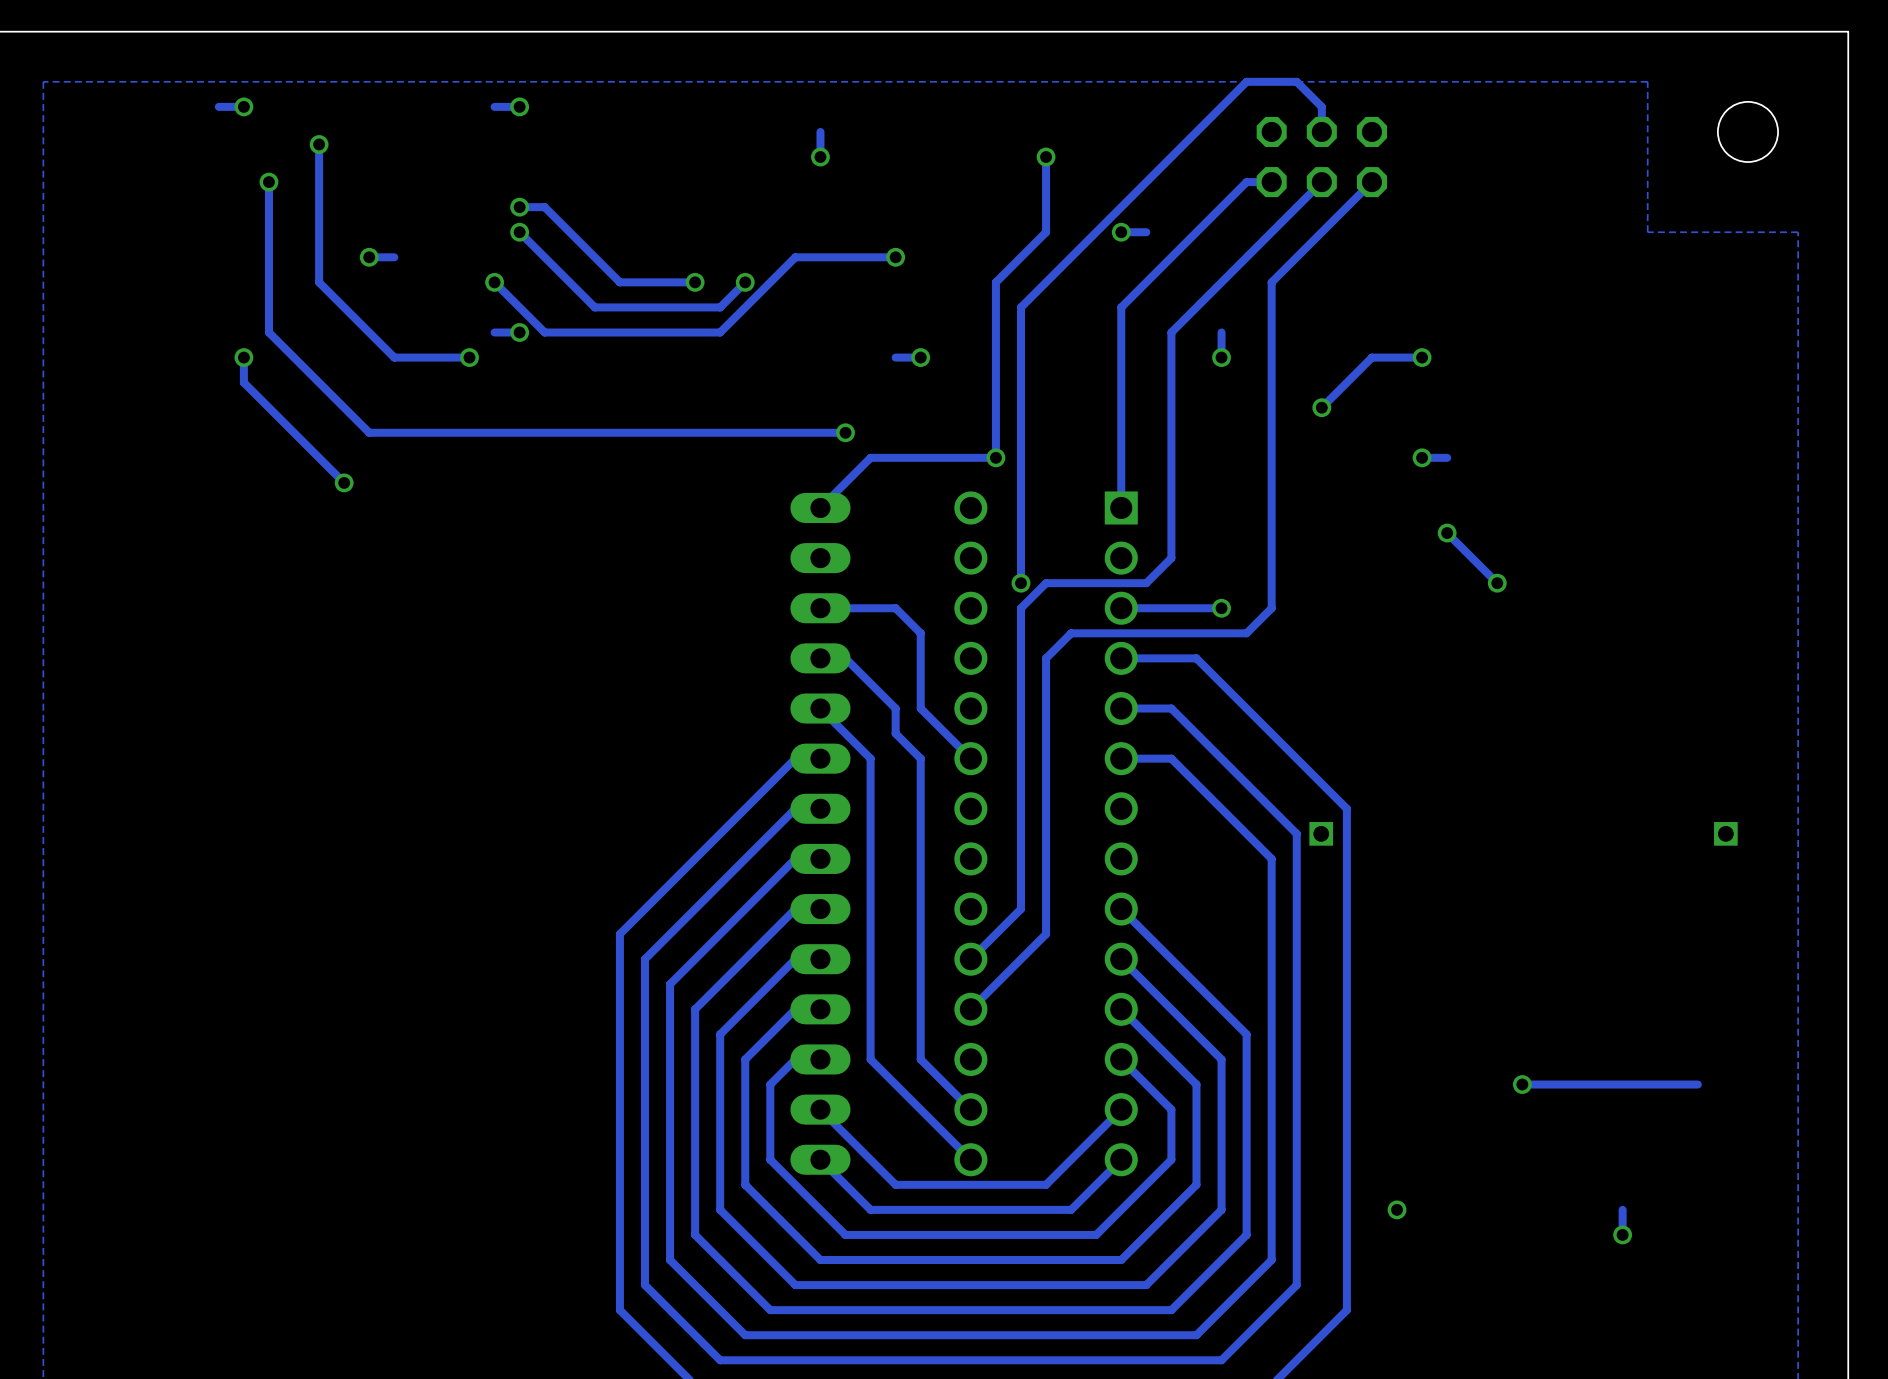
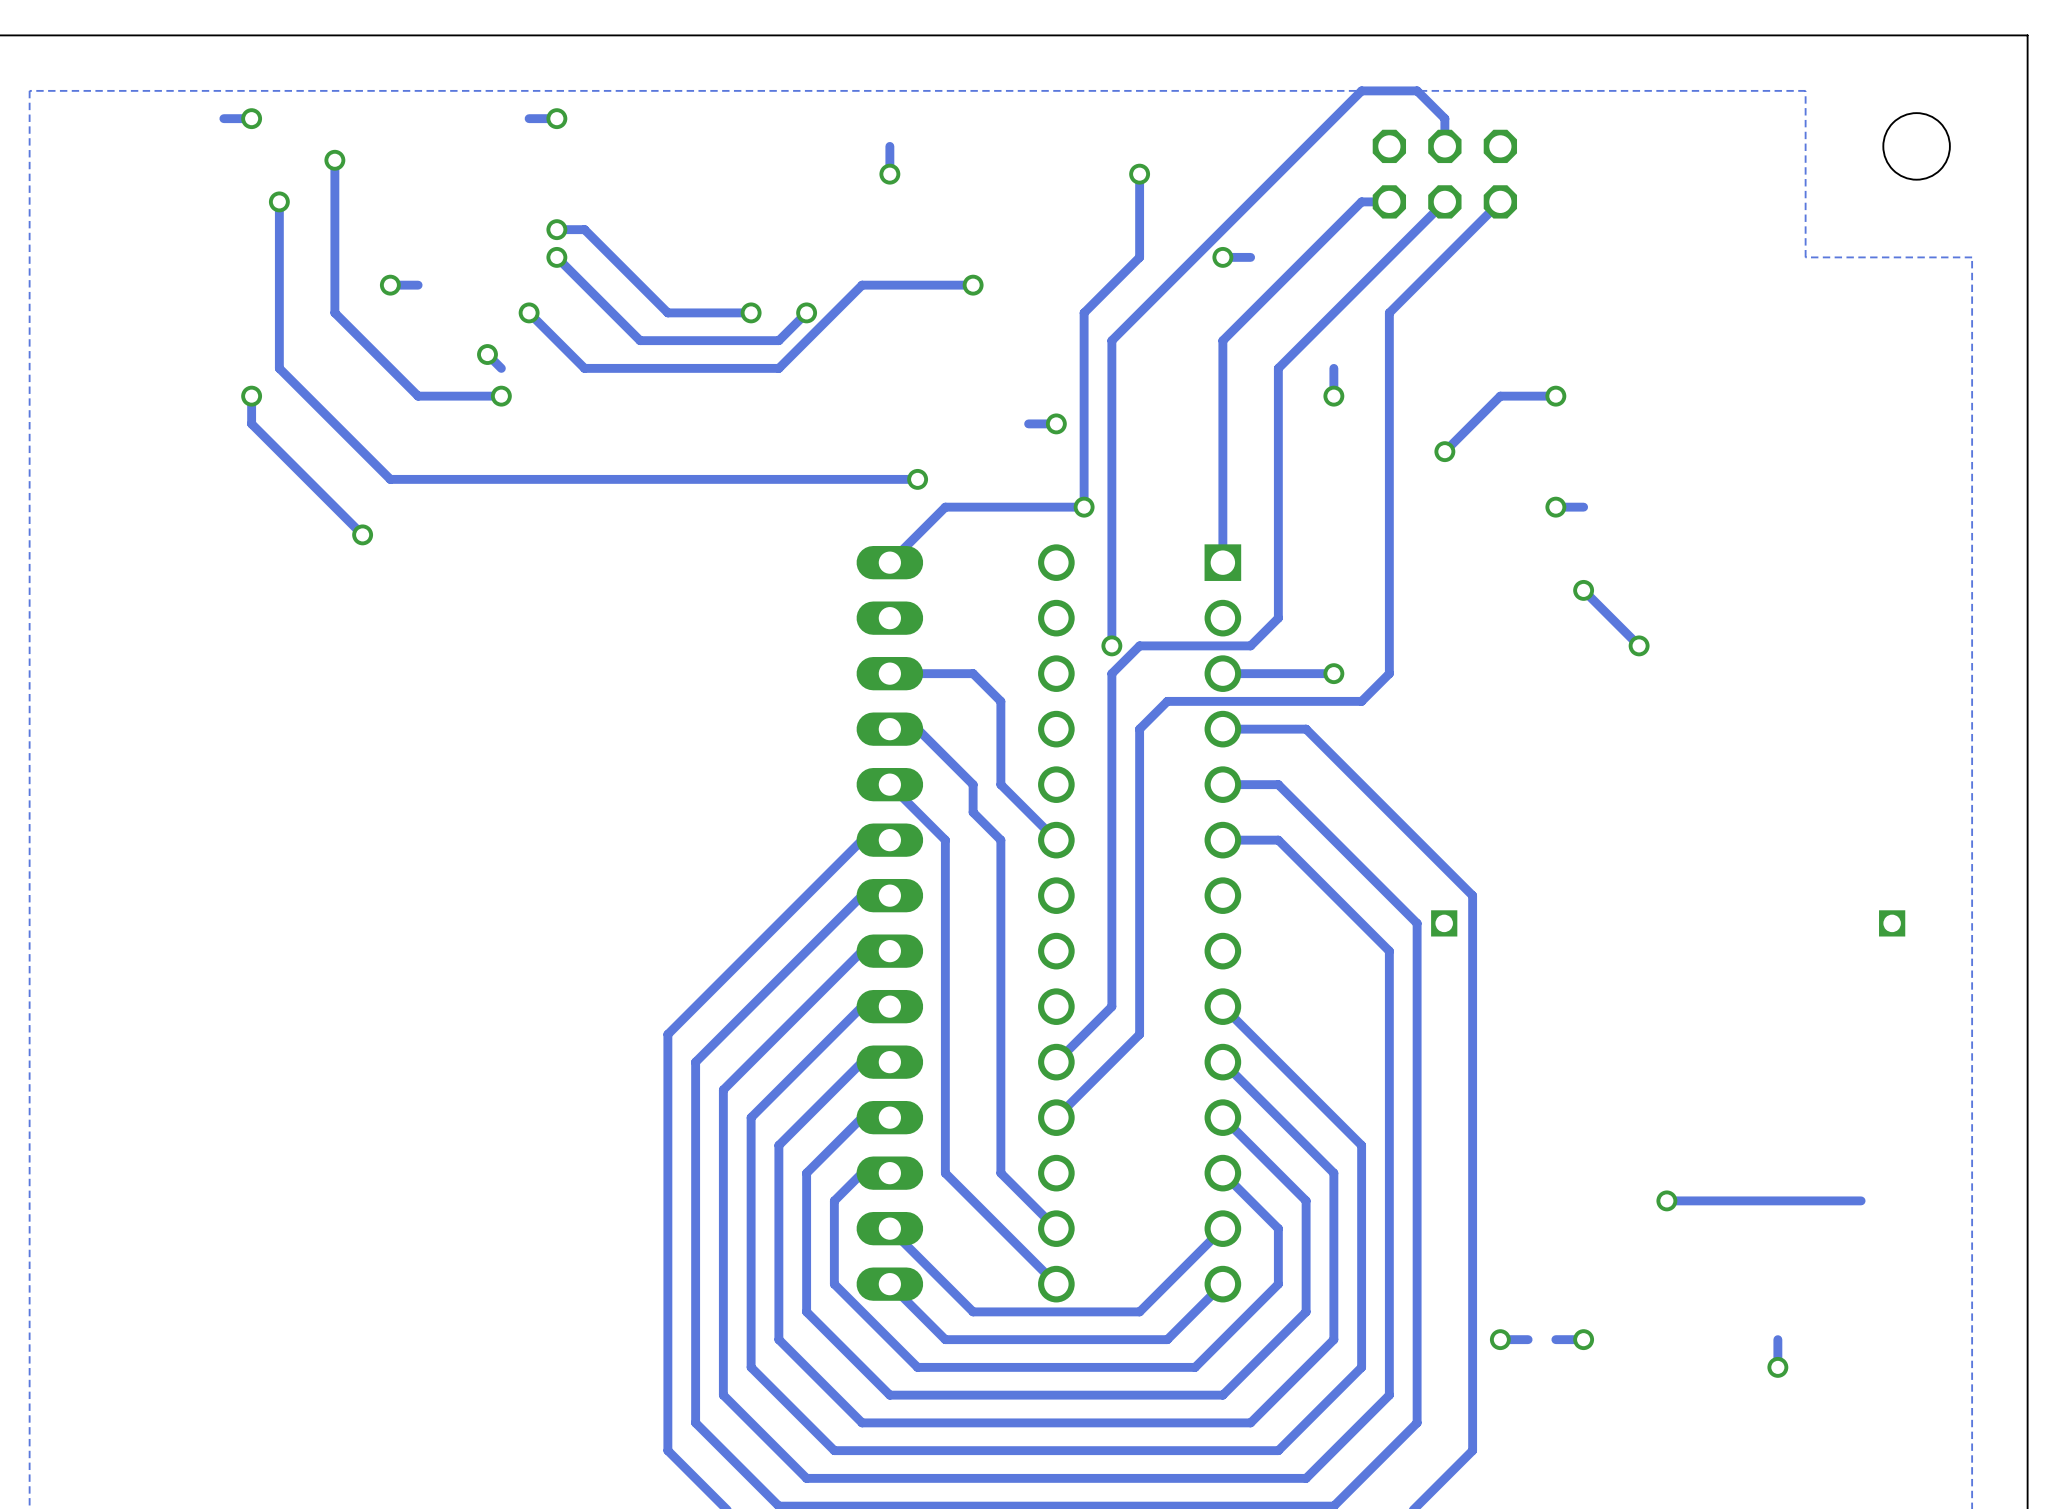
track: none -> (487, 354) (501, 368)
track: (519, 332) (494, 332) -> none
via position: (519, 332) -> (487, 354)
track: (920, 357) (895, 357) -> (1056, 423) (1028, 423)
via position: (920, 357) -> (1056, 423)
via: none -> (1500, 1339)
track: none -> (1528, 1339) (1500, 1339)
via: (1397, 1209) -> none
track: none -> (1583, 1339) (1555, 1339)
via: none -> (1583, 1339)

